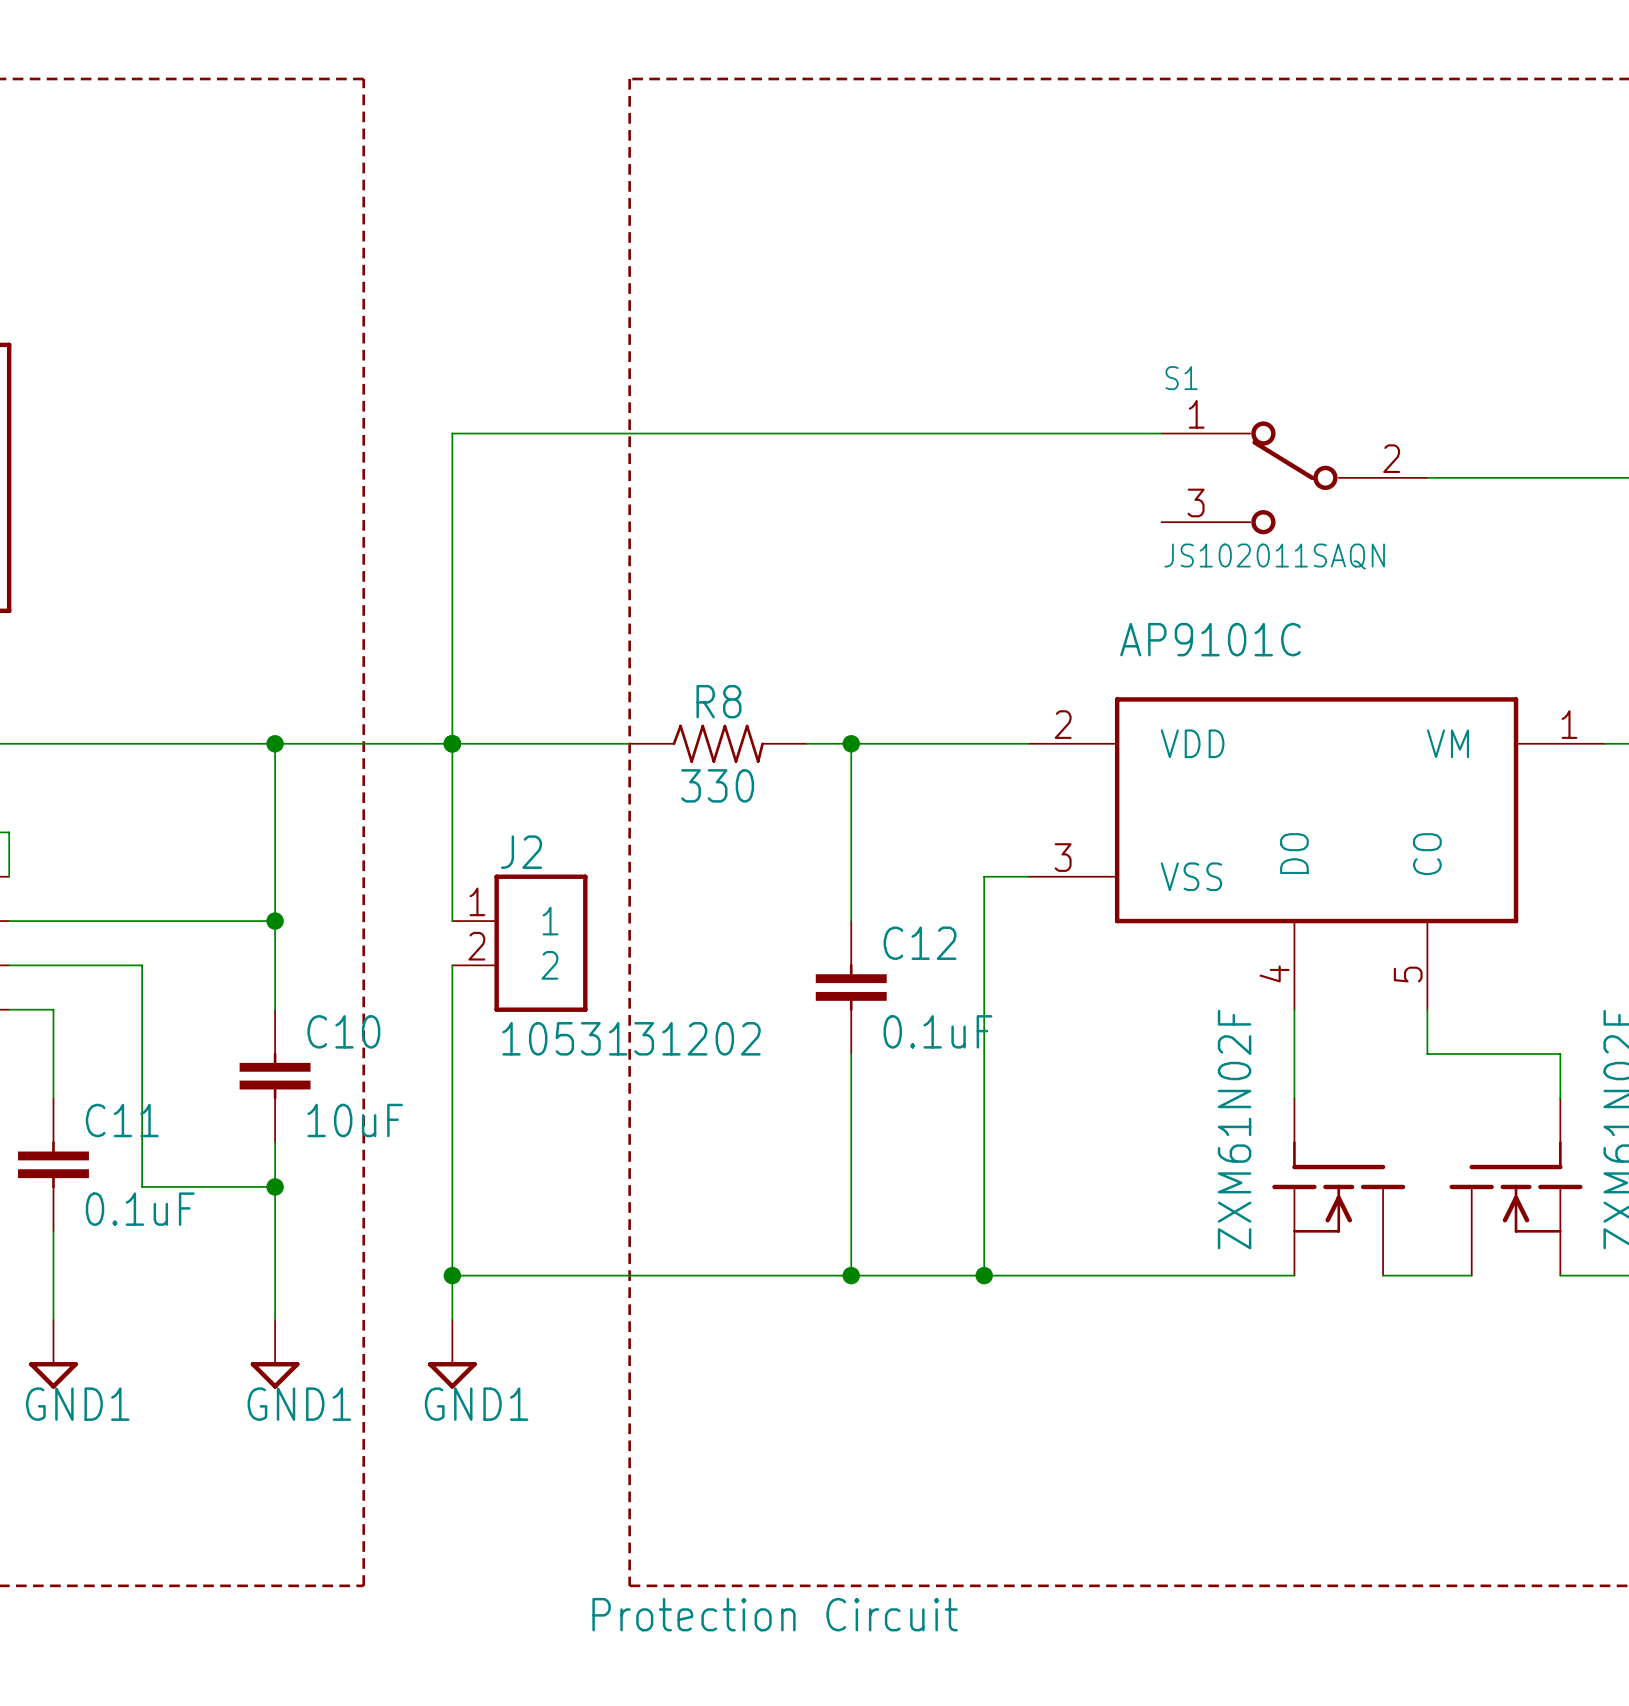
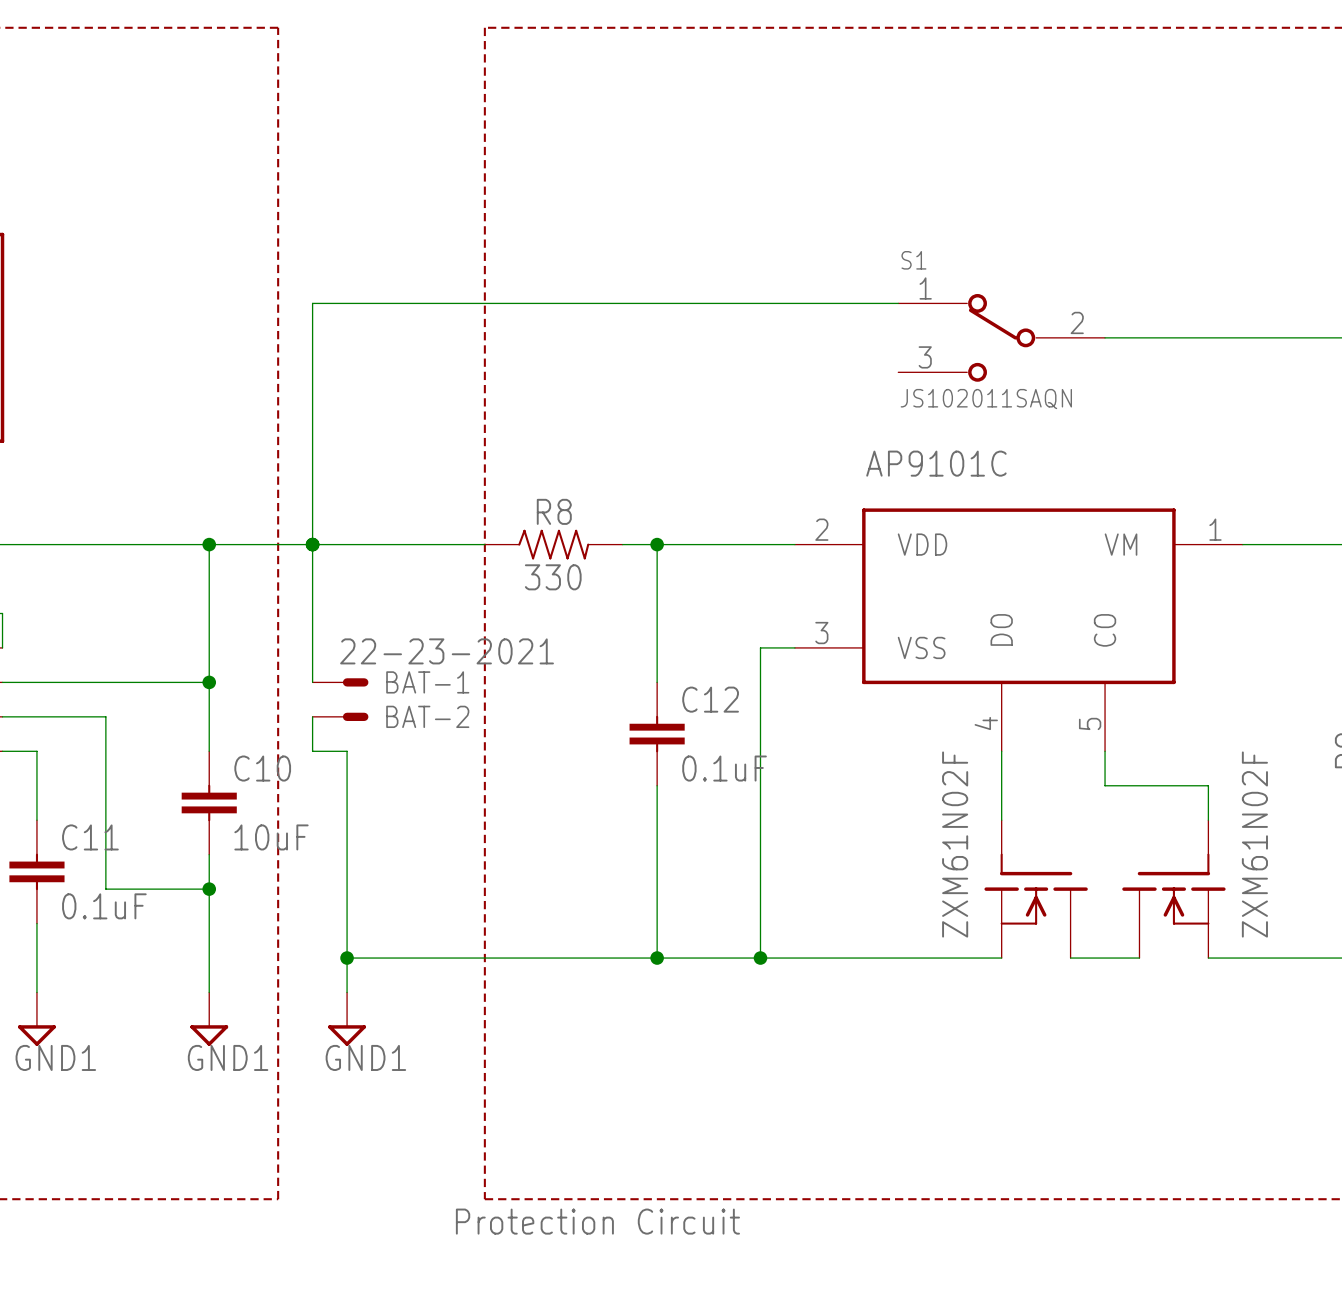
wire: (452, 433) (452, 921) -> (347, 303) (312, 303) (312, 682)
junction position: (452, 743) -> (312, 544)
BAT-1: none -> 22-23-2021 (340, 682)
J2: 1053131202 (519, 943) -> none
BAT-2: none -> (340, 716)
wire: (452, 965) (452, 1009) -> (312, 716) (312, 751) (347, 751)

